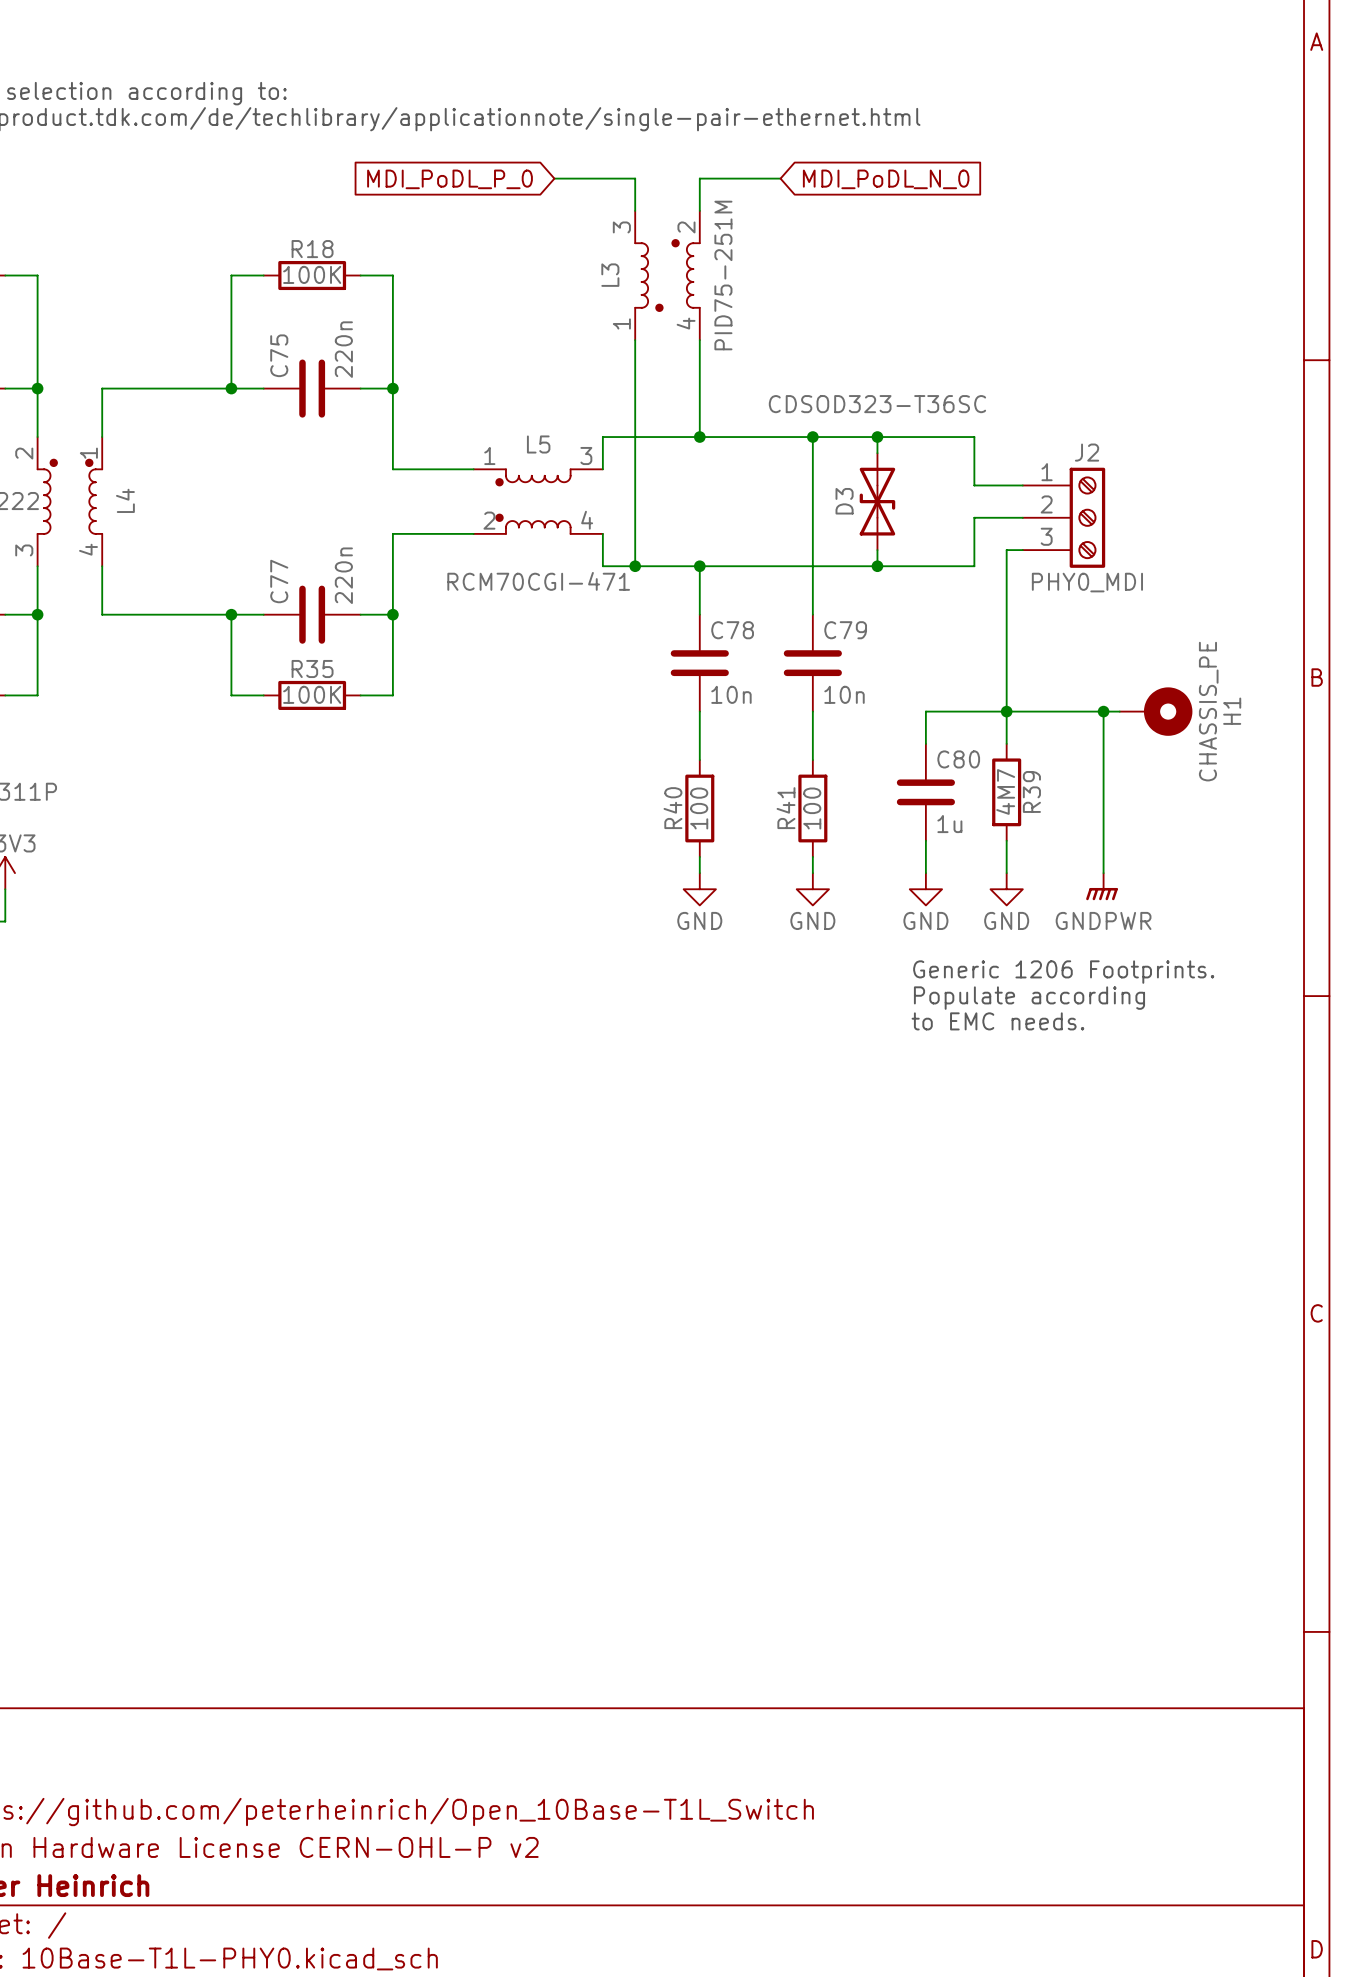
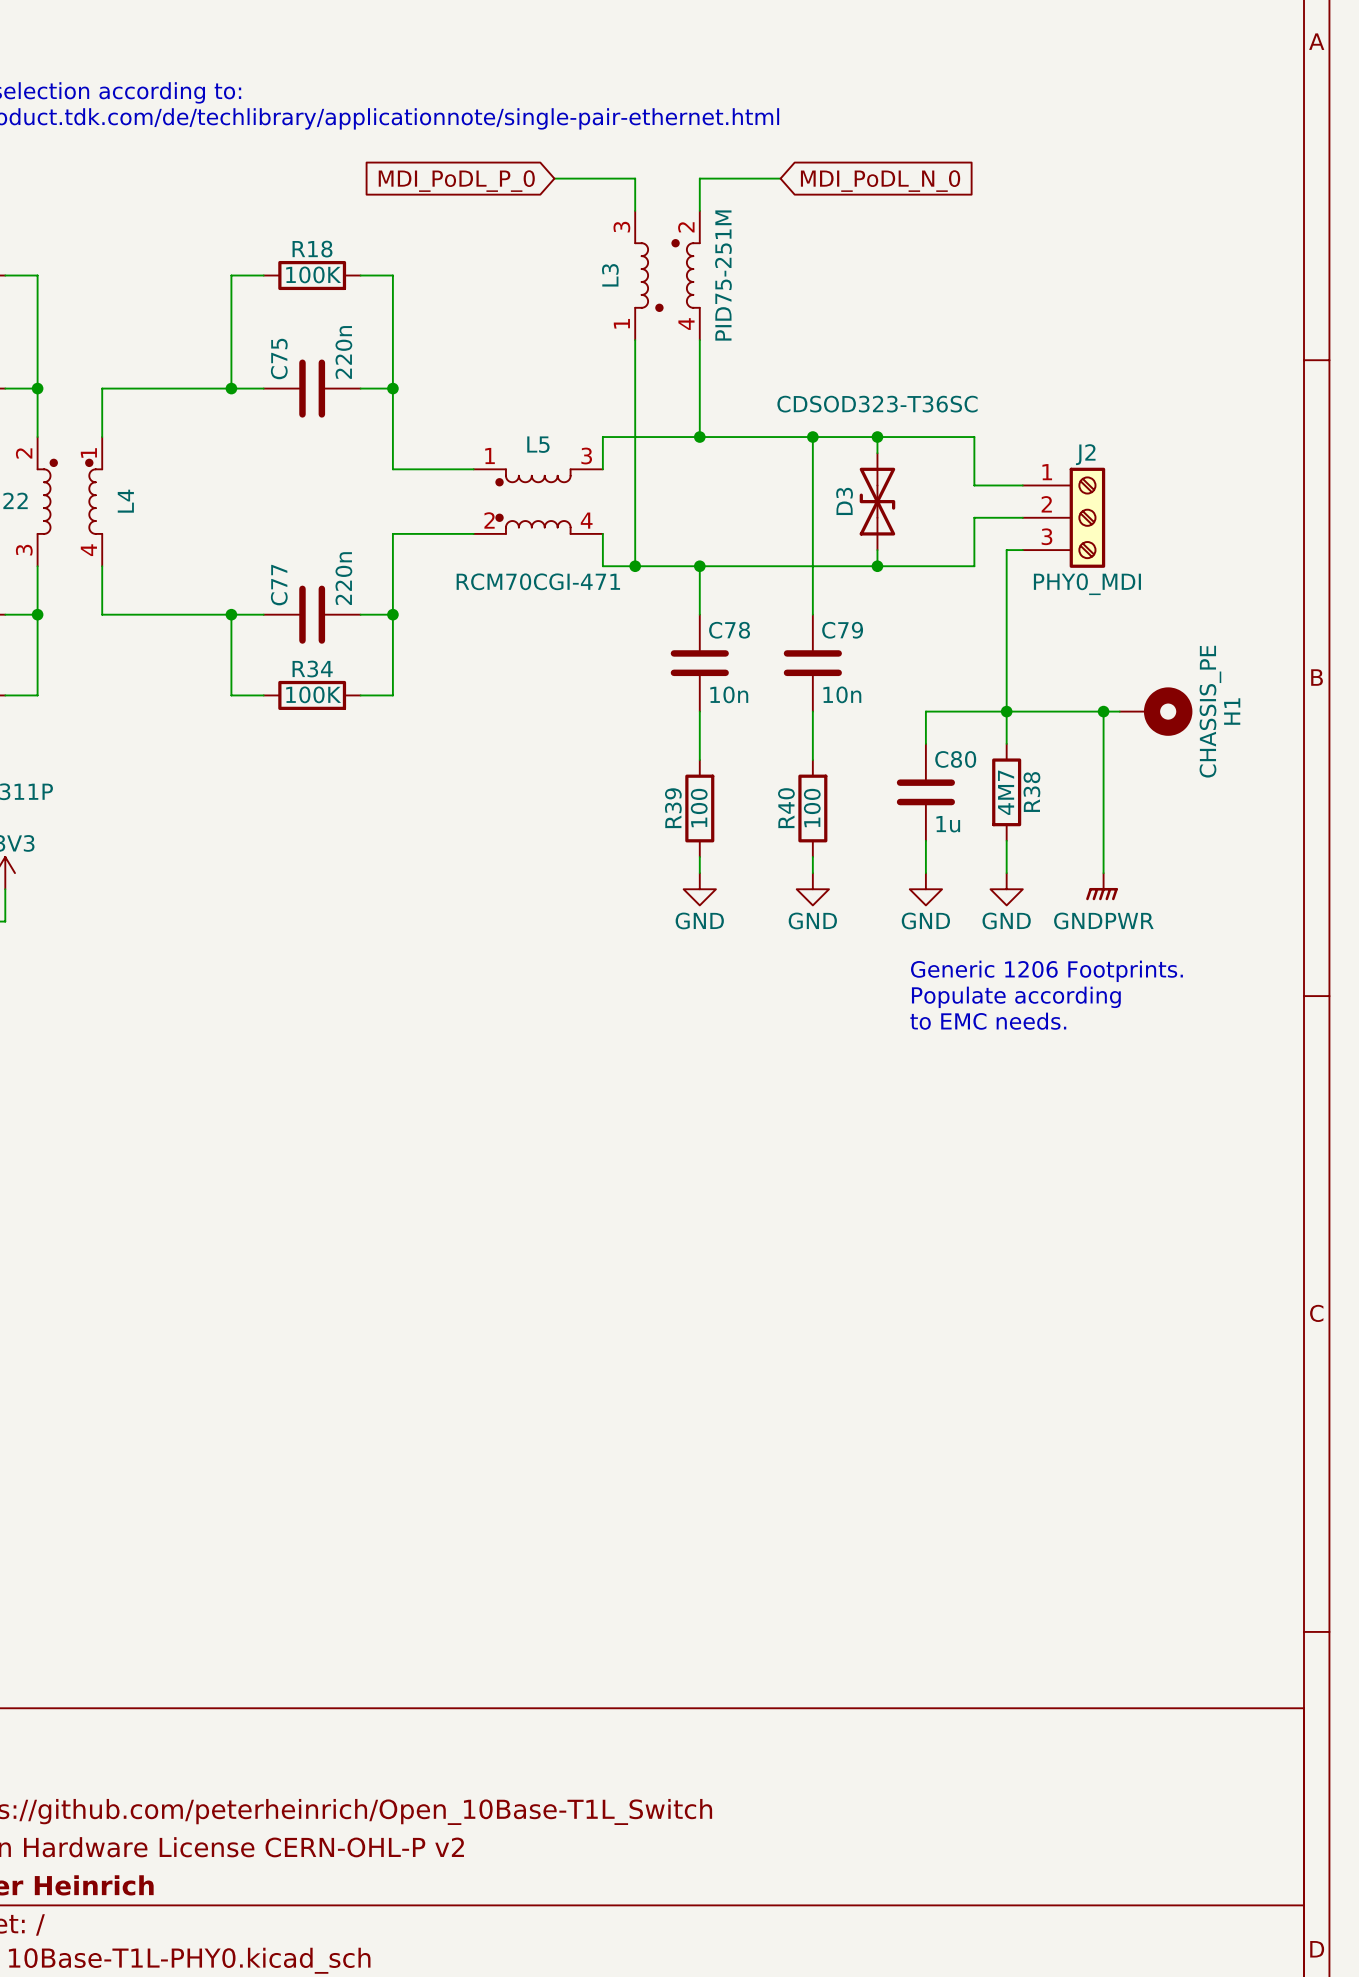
R35 name: R35 (312, 669) -> R34 (312, 669)
R39 name: R39 (1031, 791) -> R38 (1031, 792)
R40 name: R40 (672, 808) -> R39 (673, 808)
R41 name: R41 (786, 808) -> R40 (786, 808)

